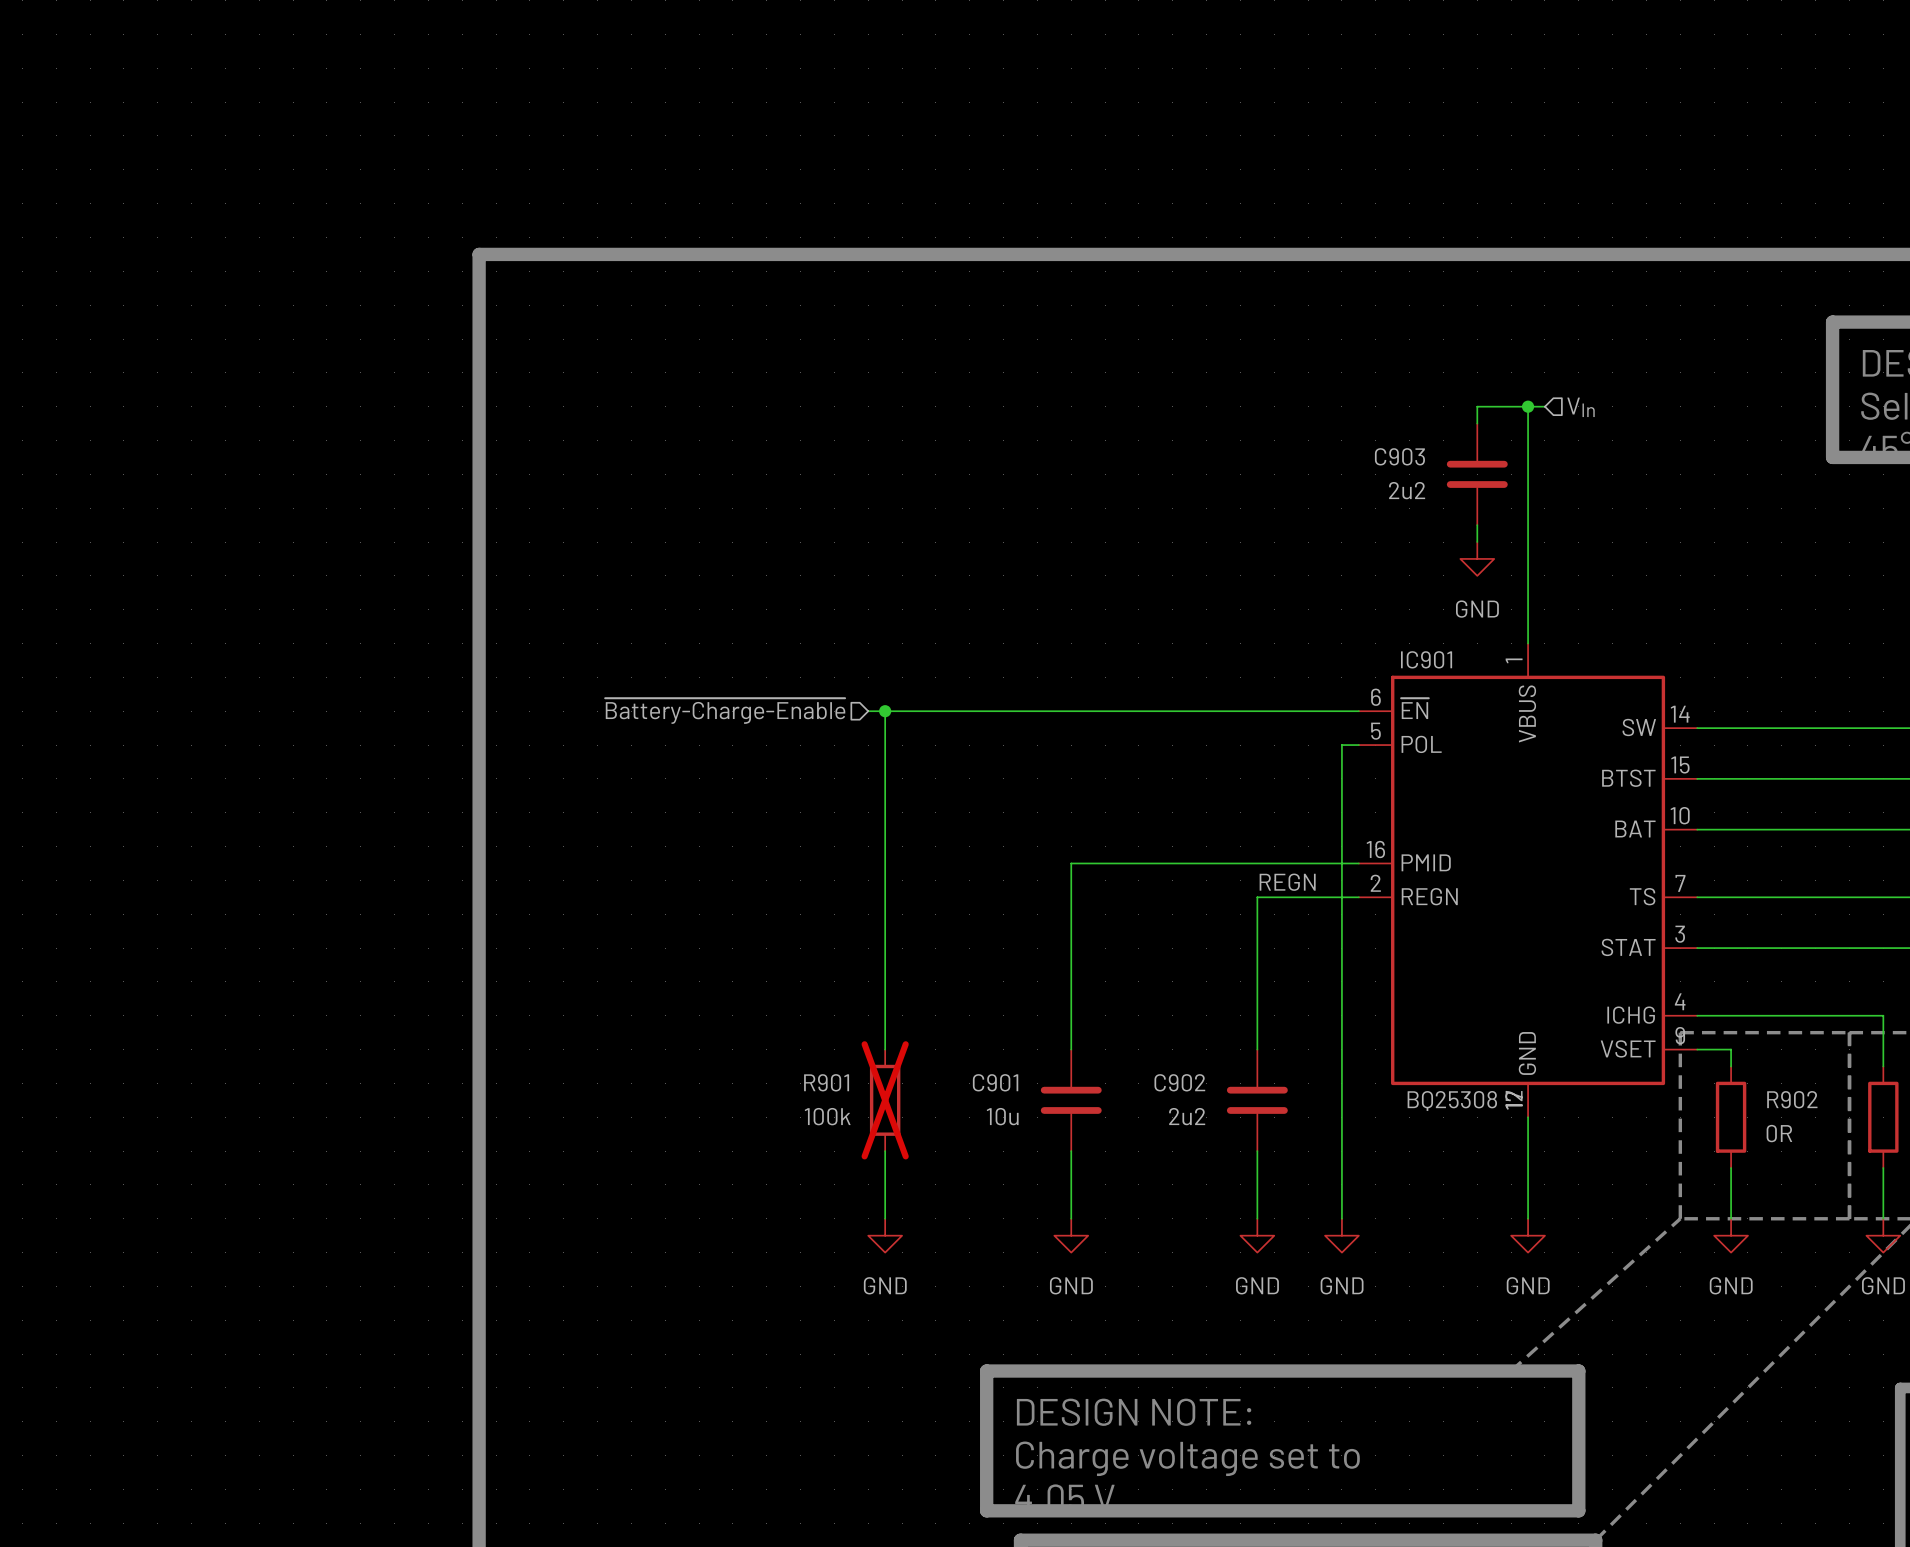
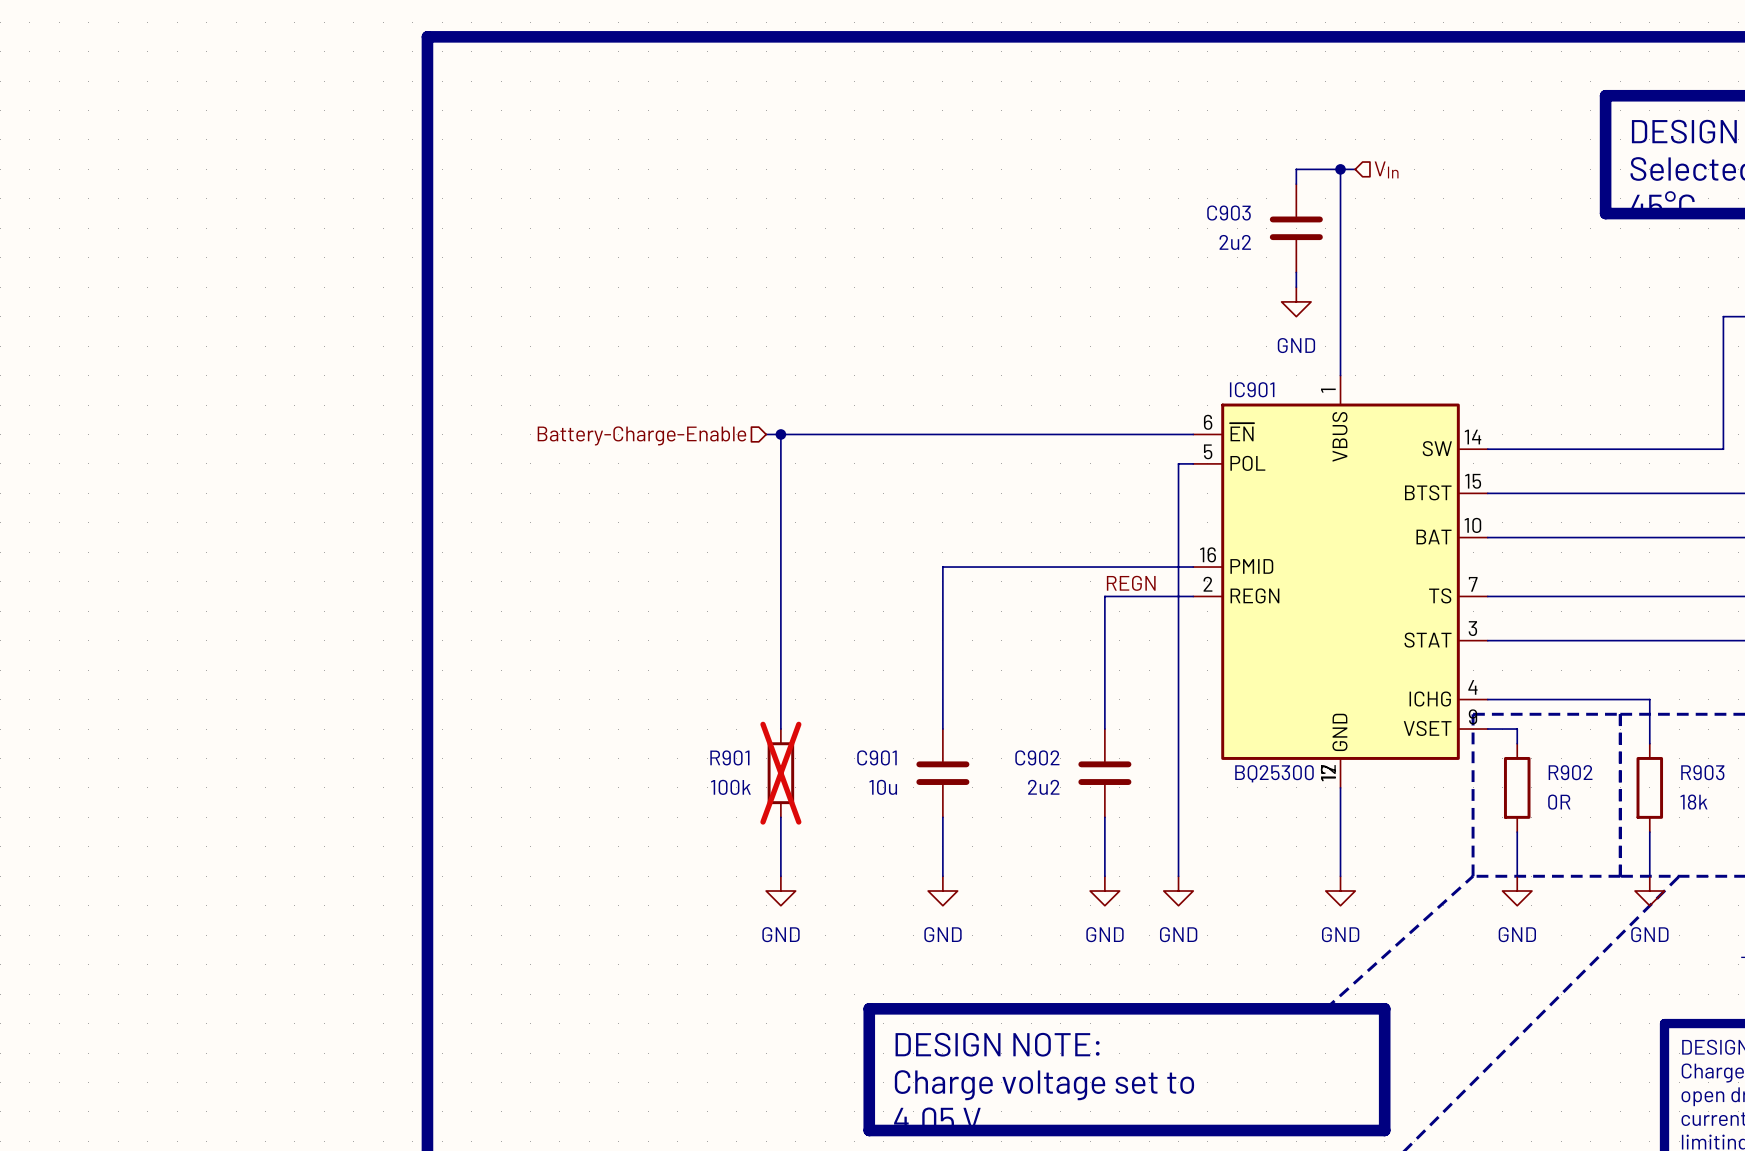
hierarchical label: ~{Battery-Charge-Enable} (725, 711) -> Battery-Charge-Enable (641, 435)
IC901 value: BQ25308 (1452, 1100) -> BQ25300 (1274, 773)

